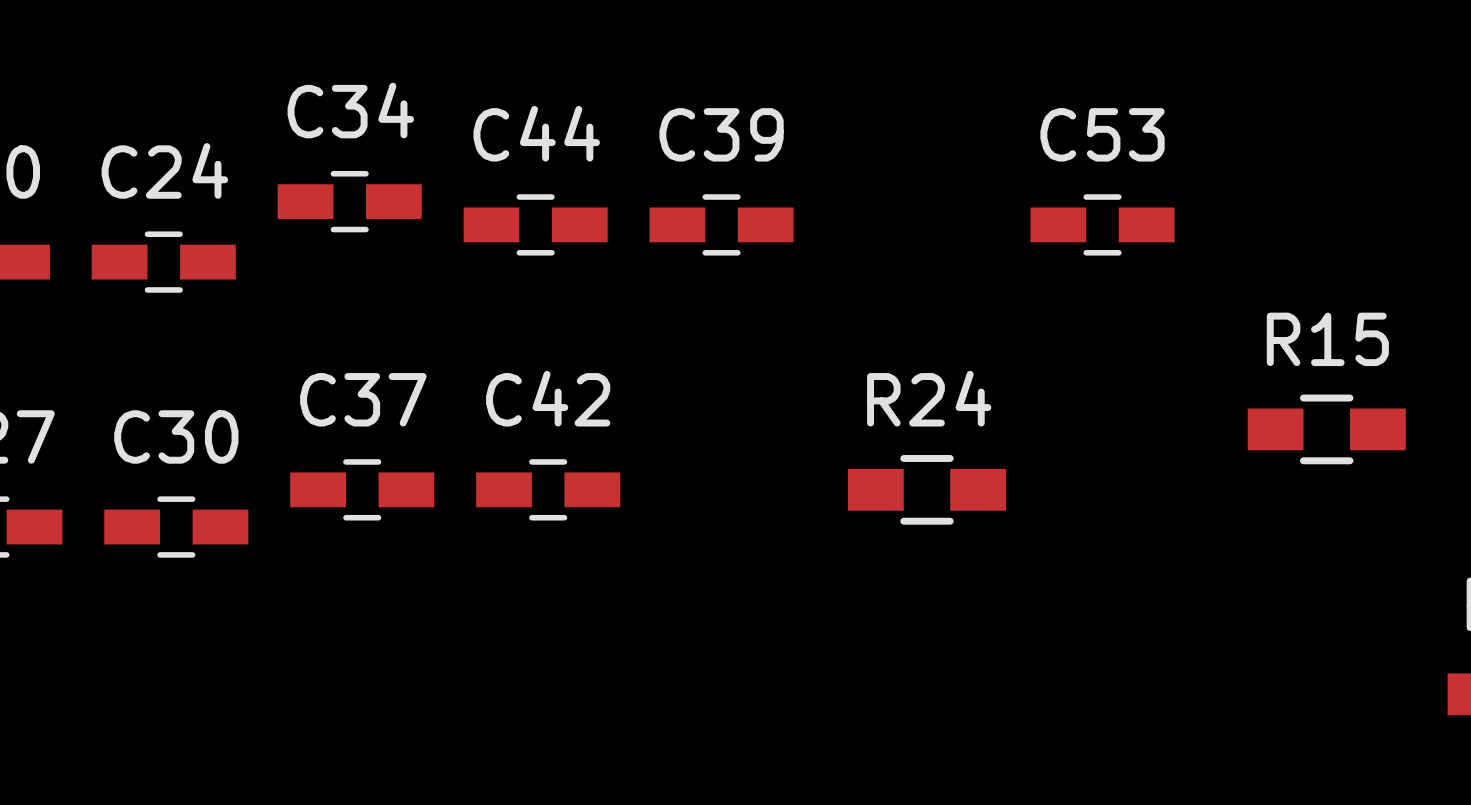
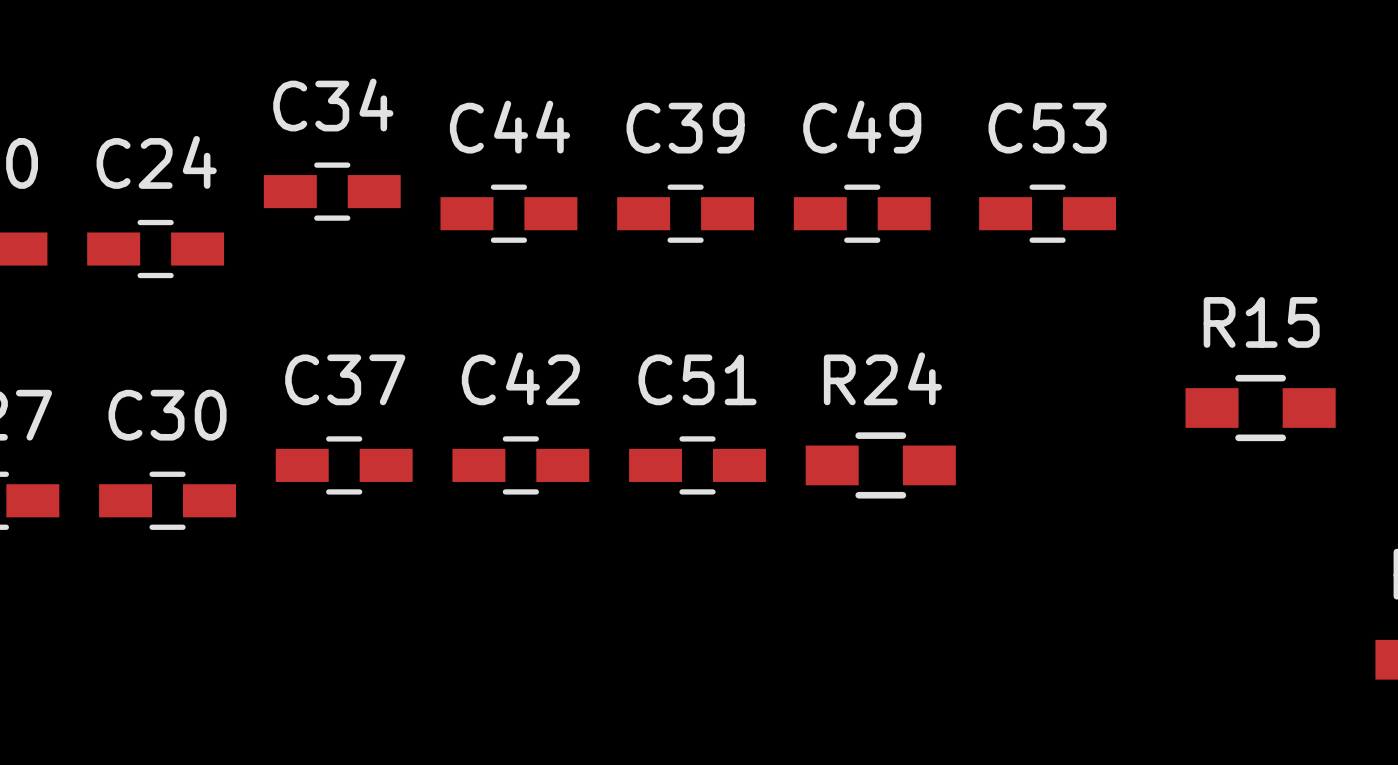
C49: none -> (862, 213)
C51: none -> (697, 465)

